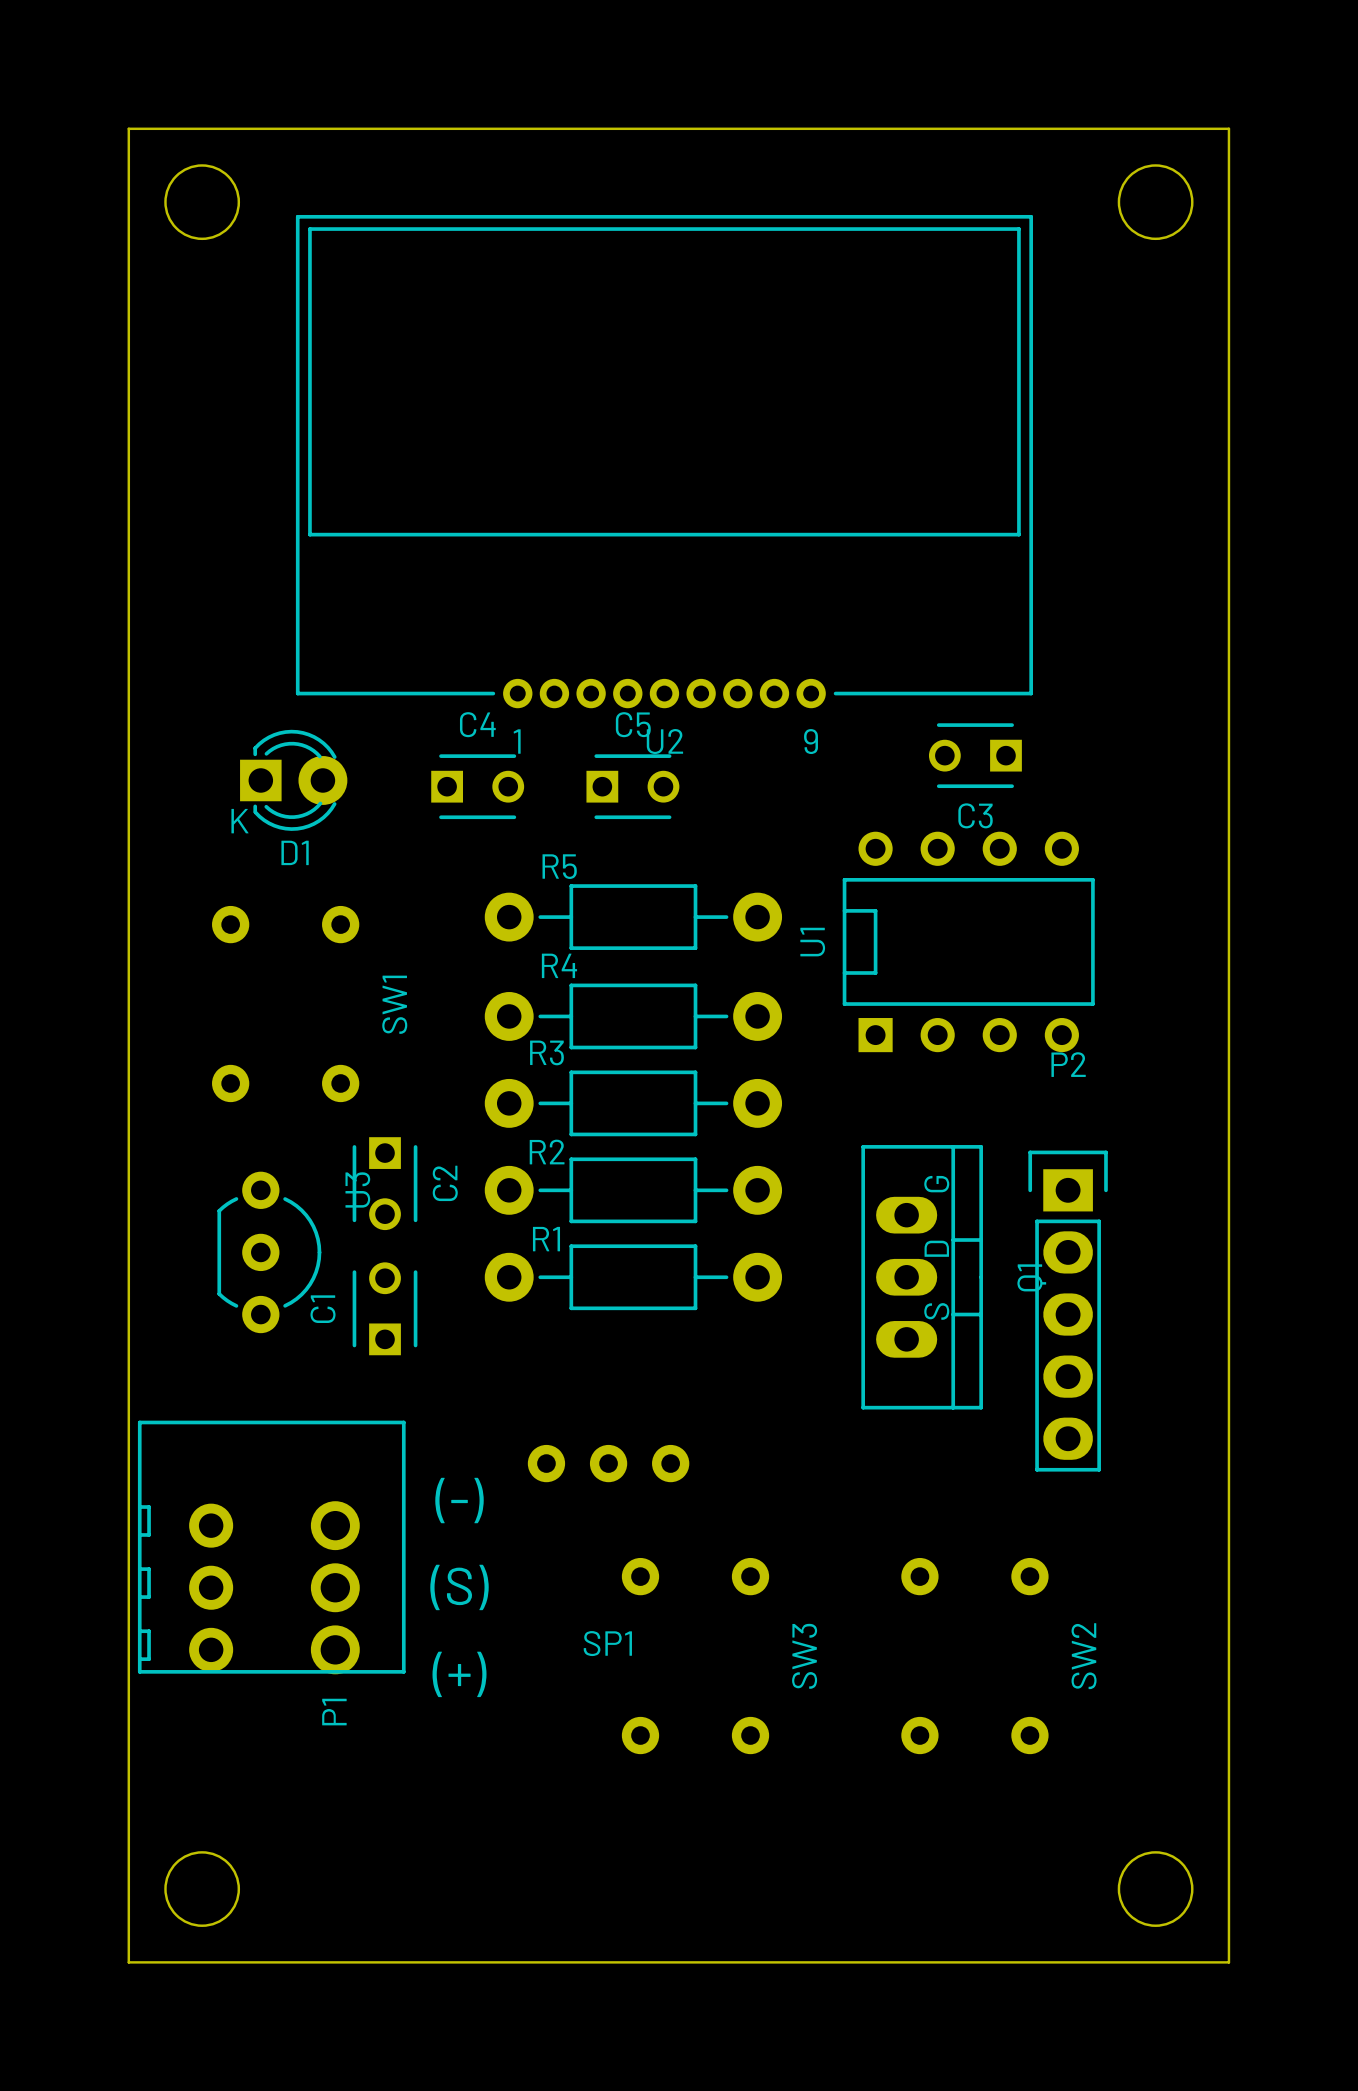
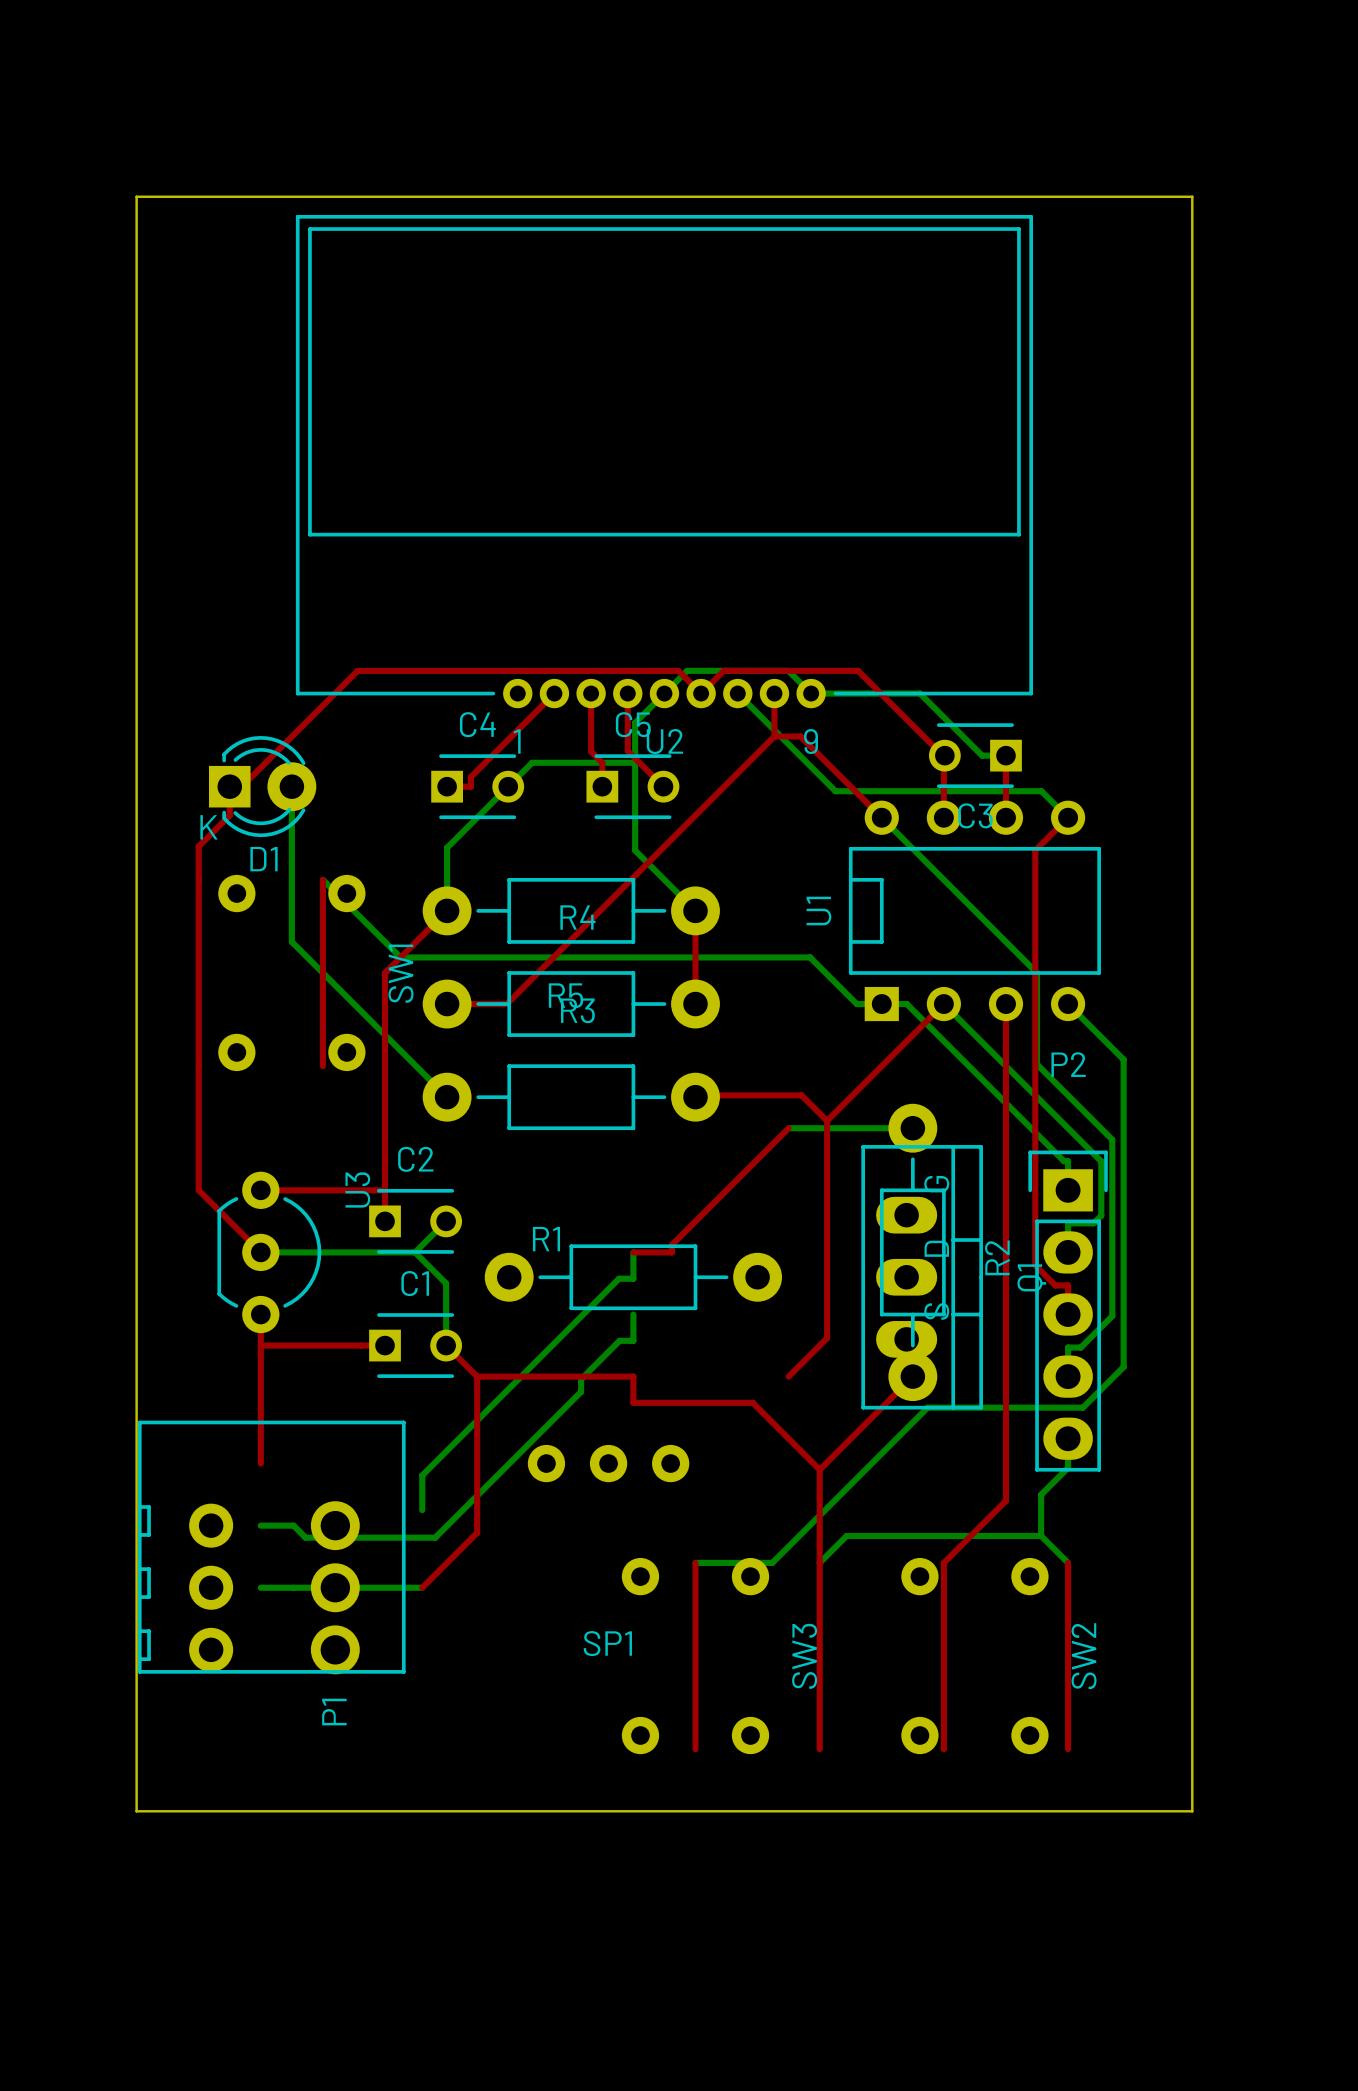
board edge: (128, 128) (1228, 128) (1228, 1962) (128, 1962) (128, 128) -> (136, 196) (136, 1811) (1192, 1811) (1192, 196) (136, 196)
round board edge: [164, 164, 241, 241] -> none
round board edge: [1117, 164, 1194, 241] -> none
top track: none -> (554, 693) (470, 777) (470, 786) (447, 786)
top track: none -> (591, 693) (591, 751) (602, 762) (602, 786)
top track: none -> (627, 693) (627, 751) (663, 786)
bottom track: none -> (737, 693) (835, 791) (1041, 791) (1068, 817)
top track: none -> (774, 693) (774, 736)
top track: none -> (774, 736) (506, 1004) (447, 1004)
top track: none -> (774, 736) (800, 736) (881, 817)
top track: none -> (1005, 755) (1005, 817)
bottom track: none -> (1005, 755) (982, 755) (920, 693) (811, 693) (788, 670) (687, 670) (635, 722) (635, 850) (695, 910)
top track: none -> (943, 756) (943, 817)
top track: none -> (943, 756) (858, 670) (723, 670) (701, 693) (678, 670) (357, 670) (229, 798)
bottom track: none -> (635, 762) (532, 762) (447, 847) (447, 910)
D1 position: (293, 780) -> (262, 786)
top track: none -> (229, 786) (229, 815) (198, 846) (198, 1190) (260, 1252)
bottom track: none -> (291, 786) (291, 941) (447, 1097)
bottom track: none -> (881, 817) (1037, 972) (1037, 1064) (1112, 1139) (1112, 1316) (1080, 1347) (1068, 1347) (1068, 1376)
top track: none -> (1068, 817) (1035, 850) (1035, 1265) (1055, 1285) (1068, 1285) (1068, 1314)
R5 name position: R5 (559, 866) -> R5 (565, 995)
top track: none -> (322, 879) (322, 1066)
bottom track: none -> (322, 879) (400, 957) (810, 957) (856, 1004) (906, 1004) (1064, 1161) (1068, 1161) (1068, 1190)
top track: none -> (447, 910) (385, 972) (385, 1221)
top track: none -> (695, 910) (695, 1004)
R5 position: (633, 917) -> (571, 910)
U1 position: (968, 941) -> (974, 910)
R4 name position: R4 (559, 965) -> R4 (577, 917)
SW1 position: (285, 1004) -> (291, 972)
top track: none -> (943, 1004) (827, 1120)
bottom track: none -> (943, 1004) (1101, 1161) (1101, 1215) (1093, 1223) (1068, 1223) (1068, 1252)
top track: none -> (1005, 1004) (1005, 1500) (943, 1562) (943, 1749)
bottom track: none -> (1068, 1004) (1123, 1059) (1123, 1367) (1082, 1407) (927, 1407) (772, 1562) (695, 1562)
R4 position: (633, 1016) -> (571, 1004)
R3 name position: R3 (546, 1052) -> R3 (577, 1010)
top track: none -> (695, 1097) (697, 1095) (801, 1095) (827, 1120)
R3 position: (633, 1103) -> (571, 1097)
top track: none -> (827, 1120) (827, 1338) (788, 1376)
top track: none -> (788, 1128) (671, 1244) (671, 1252) (633, 1252)
bottom track: none -> (788, 1128) (912, 1128)
R2 name position: R2 (547, 1152) -> R2 (997, 1257)
C2 rotation: 0° (385, 1183) -> 90° counterclockwise (415, 1221)
top track: none -> (260, 1190) (385, 1190)
R2 rotation: 0° (633, 1190) -> 90° clockwise (912, 1252)
R2 position: (633, 1190) -> (912, 1252)
bottom track: none -> (446, 1221) (415, 1252)
bottom track: none -> (260, 1252) (415, 1252)
bottom track: none -> (415, 1252) (446, 1283) (446, 1345)
bottom track: none -> (633, 1252) (633, 1278) (619, 1278) (422, 1475) (422, 1510)
C1 rotation: 0° (385, 1308) -> 90° clockwise (415, 1345)
top track: none -> (260, 1314) (260, 1463)
bottom track: none -> (633, 1314) (633, 1340) (619, 1340) (581, 1379) (581, 1391) (435, 1537) (305, 1537) (293, 1525) (260, 1525)
top track: none -> (260, 1345) (385, 1345)
top track: none -> (446, 1345) (477, 1376)
top track: none -> (477, 1376) (477, 1532) (422, 1587)
top track: none -> (477, 1376) (633, 1376) (633, 1402) (752, 1402) (819, 1469)
top track: none -> (912, 1376) (819, 1469)
bottom track: none -> (1068, 1438) (1068, 1467) (1041, 1494) (1041, 1535)
top track: none -> (819, 1469) (819, 1749)
text: (-) (459, 1500) -> none
bottom track: none -> (1041, 1535) (846, 1535) (819, 1562)
bottom track: none -> (1041, 1535) (1068, 1562)
top track: none -> (695, 1562) (695, 1749)
top track: none -> (1068, 1562) (1068, 1749)
bottom track: none -> (260, 1587) (422, 1587)
text: (S) (459, 1587) -> none
text: (+) (459, 1674) -> none
round board edge: [164, 1851, 241, 1927] -> none
round board edge: [1117, 1851, 1194, 1927] -> none

